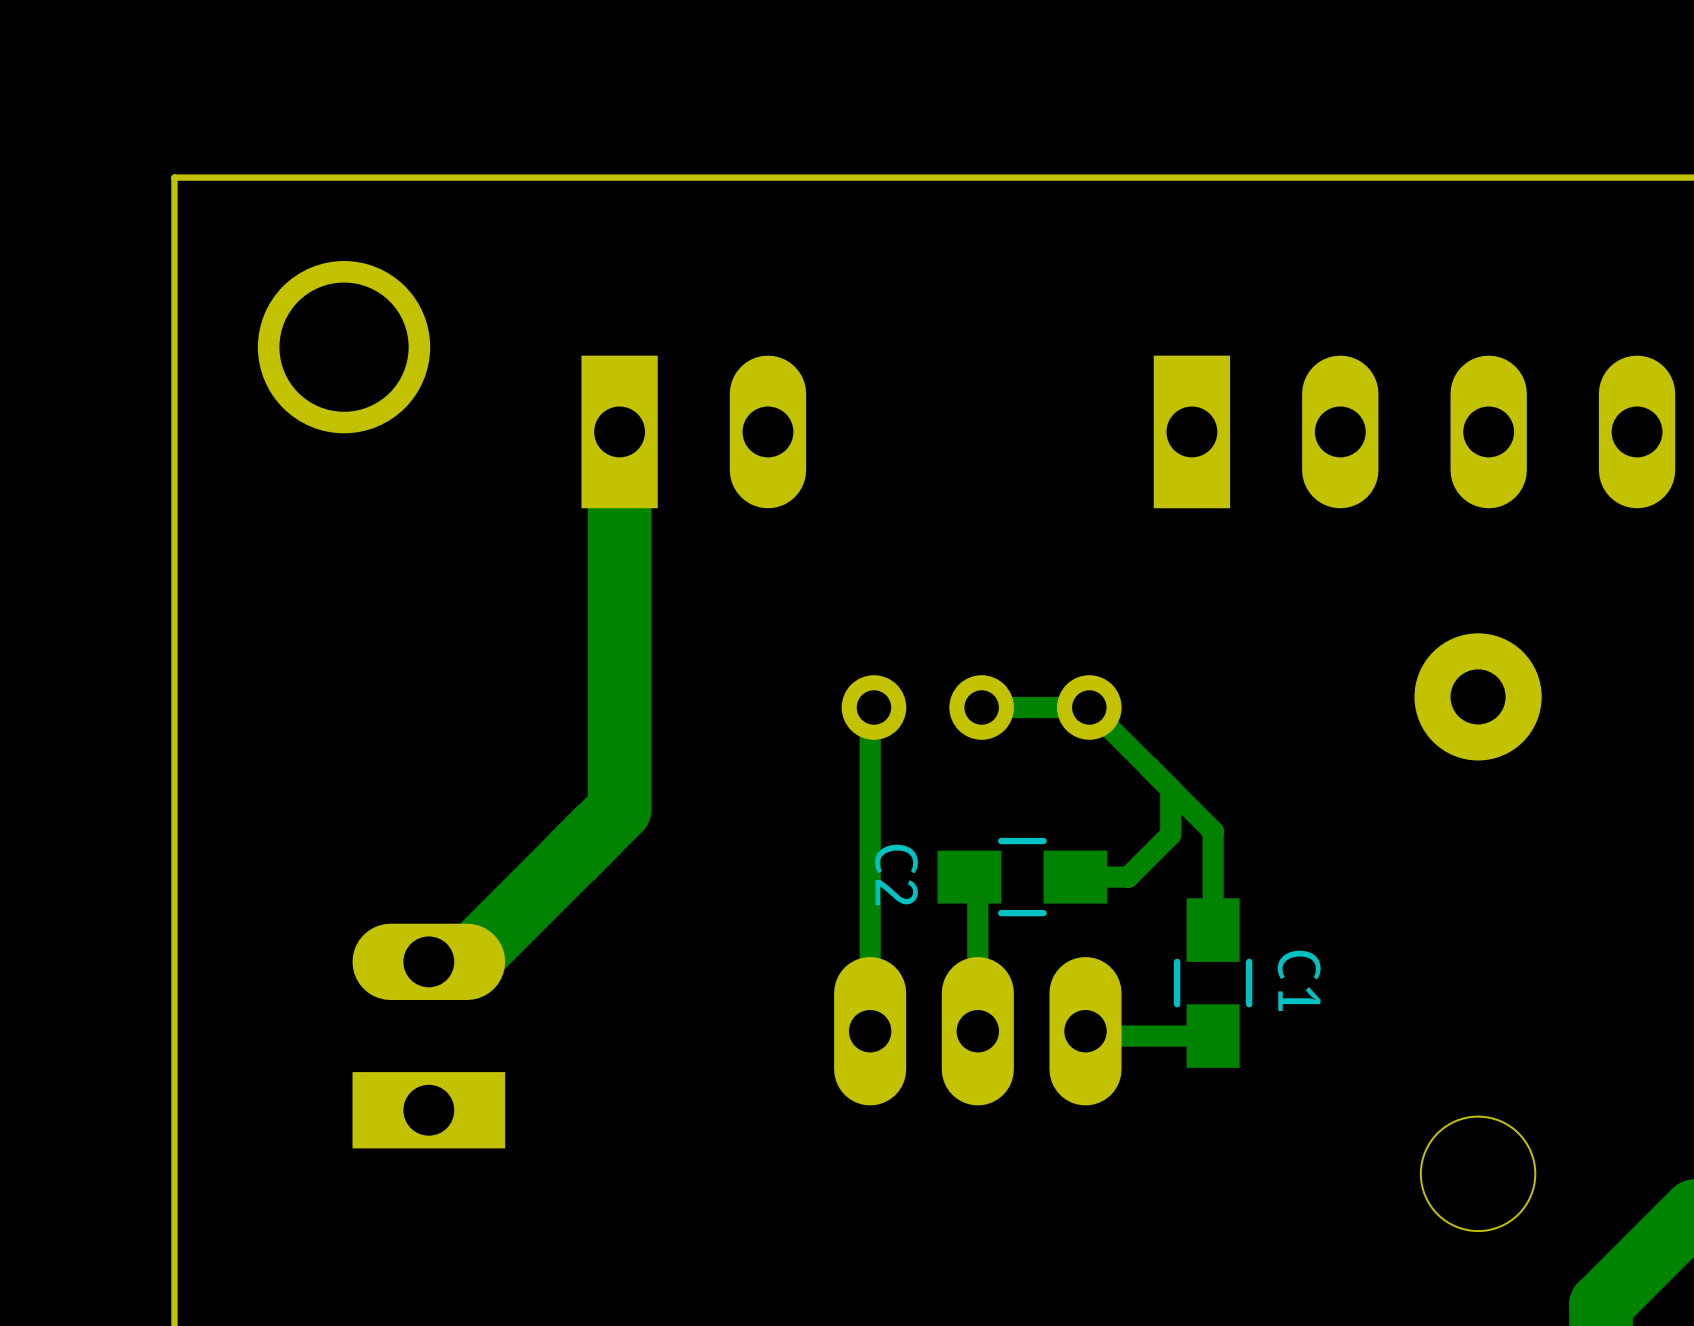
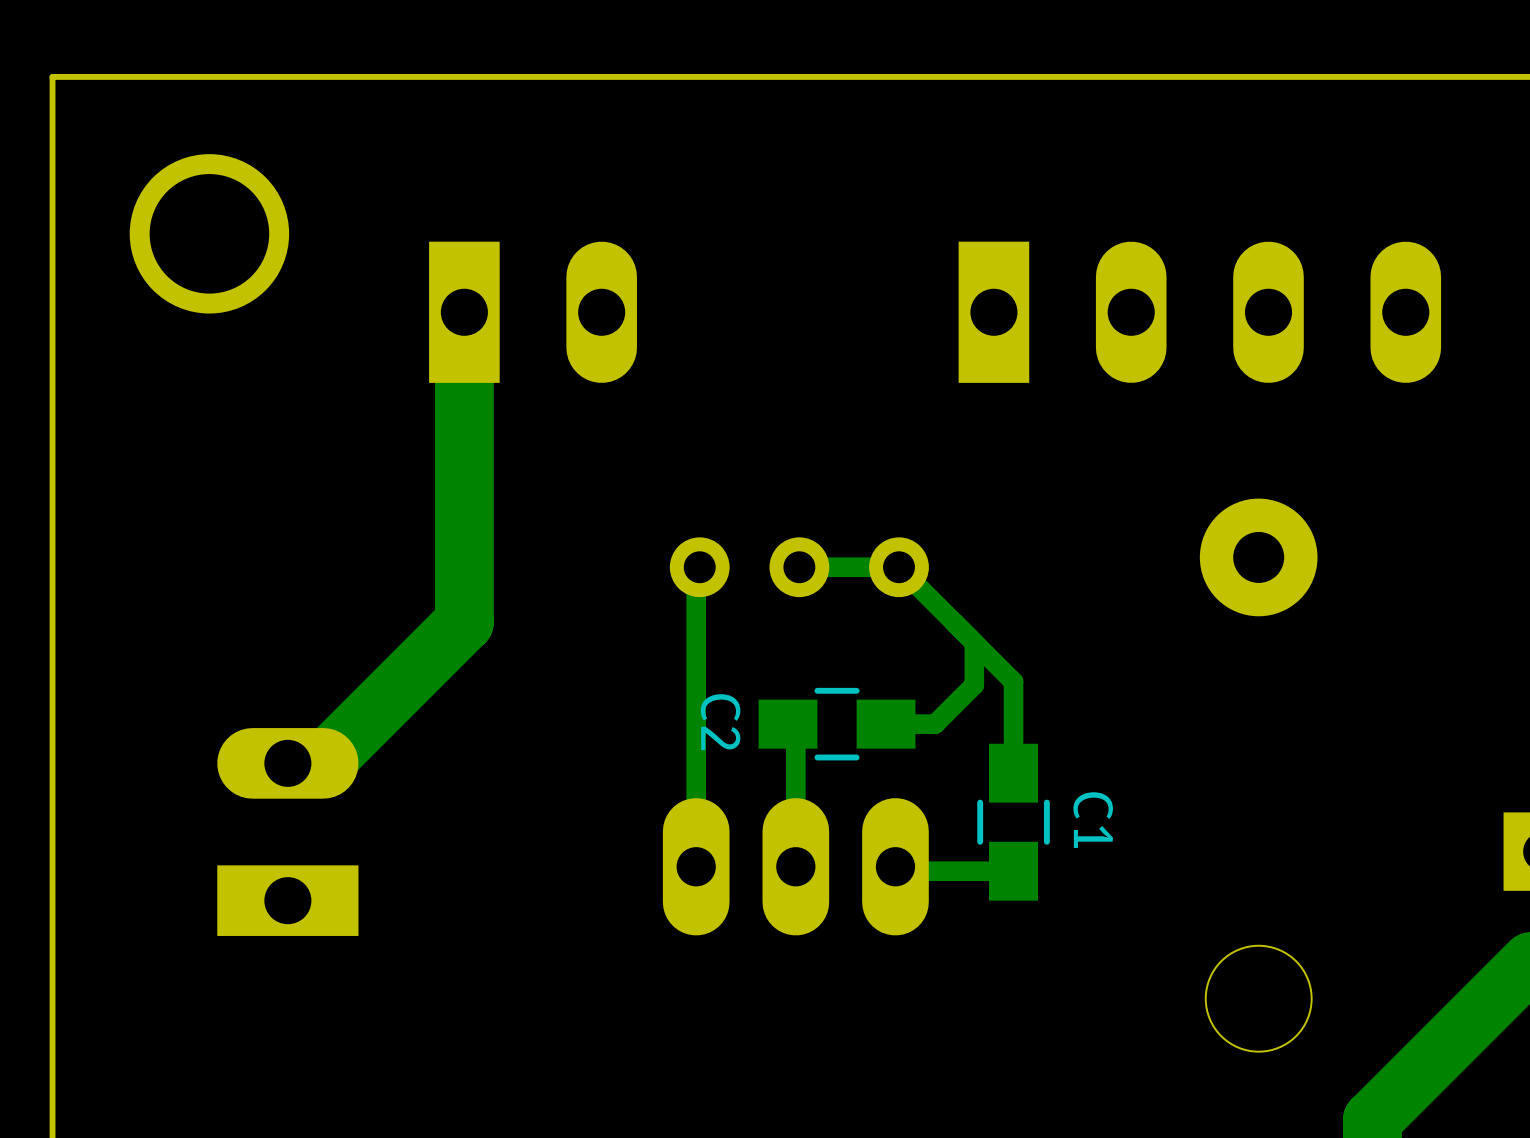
track: (619, 766) (619, 809) (466, 961) (428, 961) -> (464, 622) (323, 763) (287, 763)
part position: (428, 1036) -> (287, 832)

